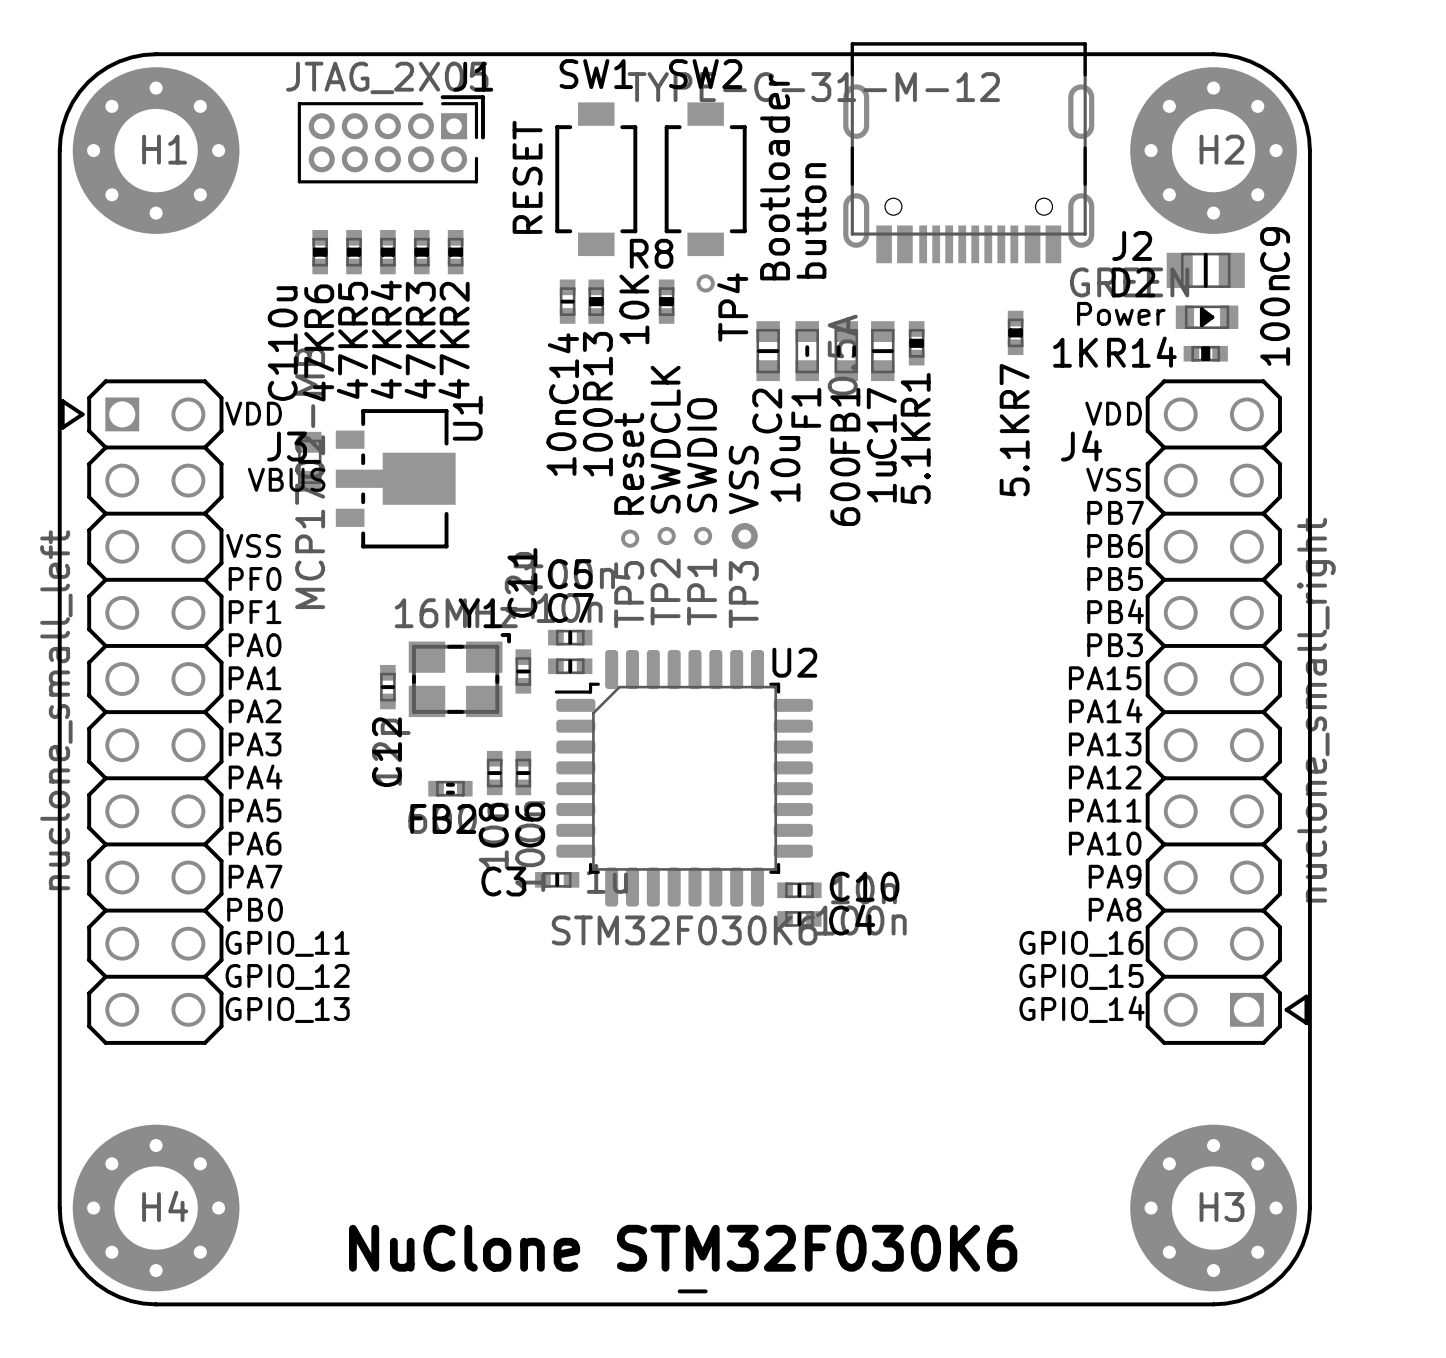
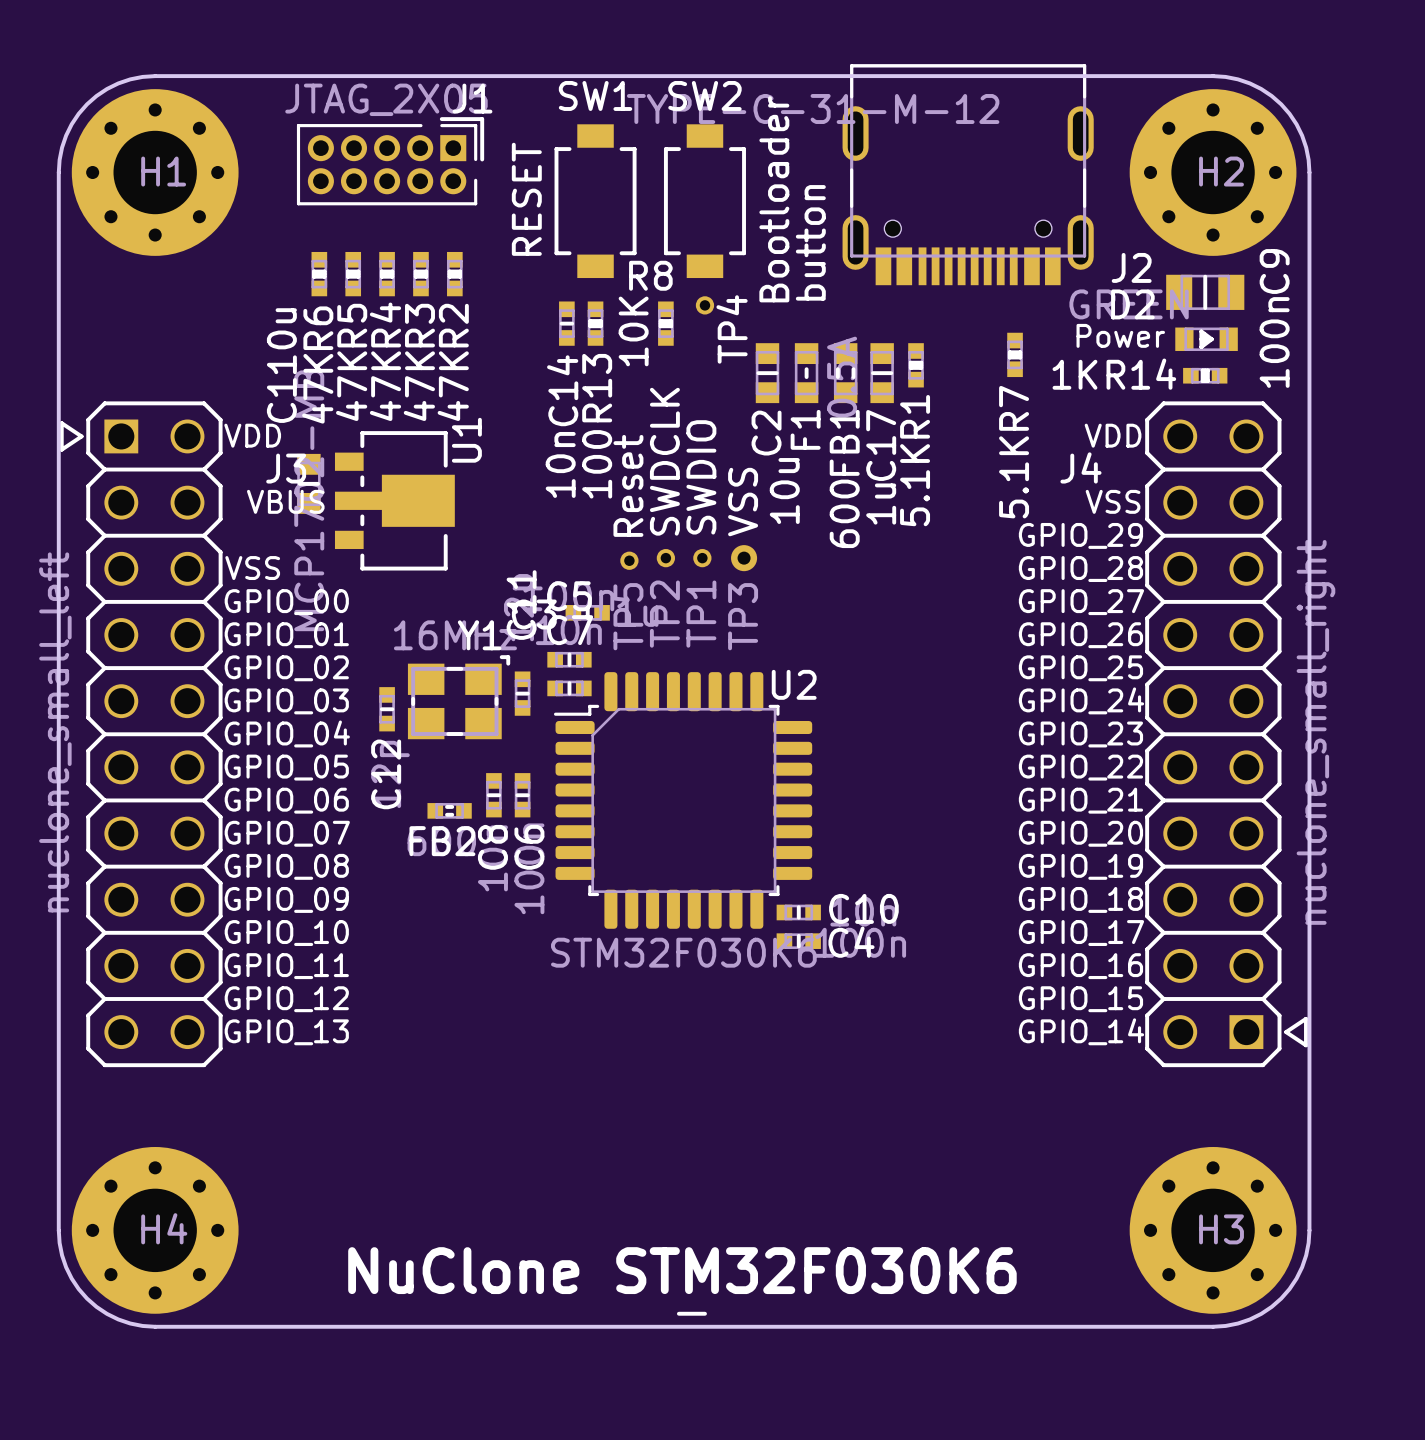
J3 footprint: [60, 379, 224, 1045] -> [59, 401, 223, 1068]
J4 footprint: [1145, 379, 1309, 1045] -> [1145, 401, 1308, 1068]
C3 position: (557, 879) -> (587, 612)

